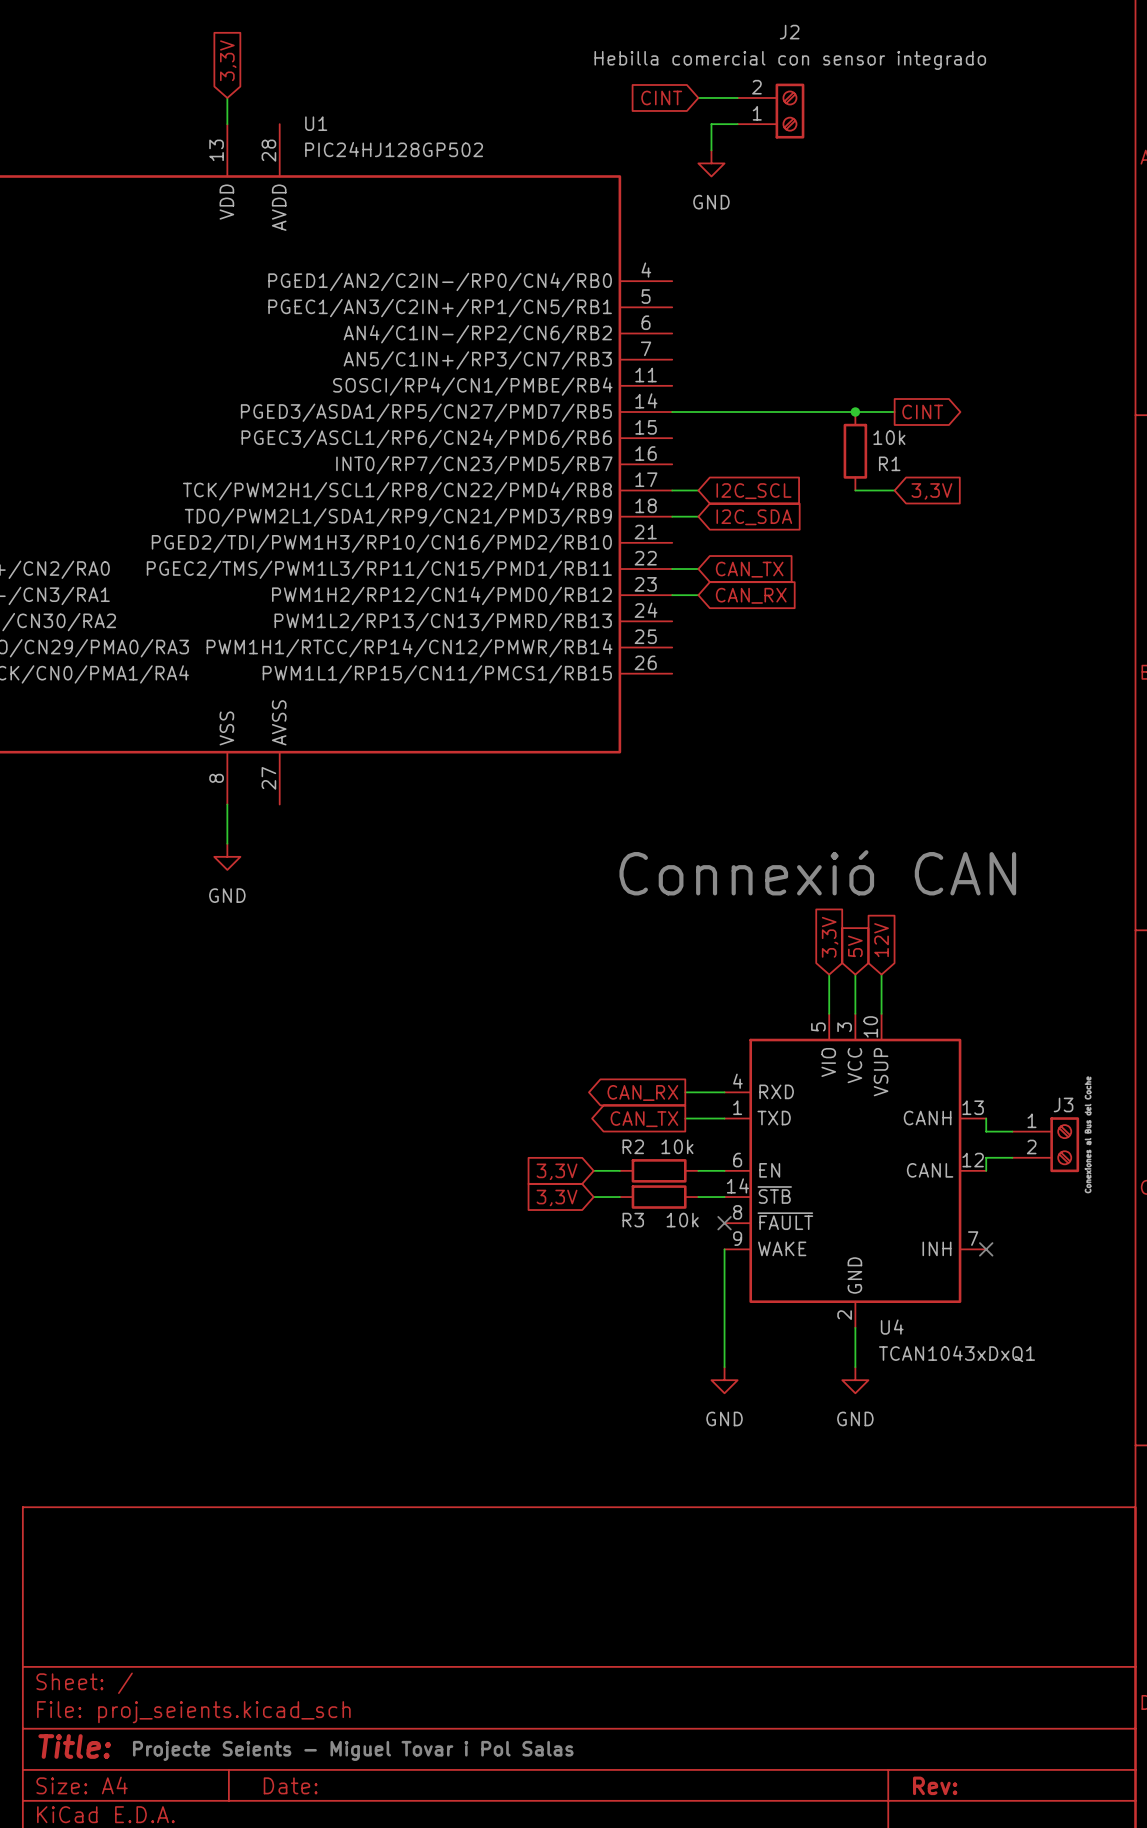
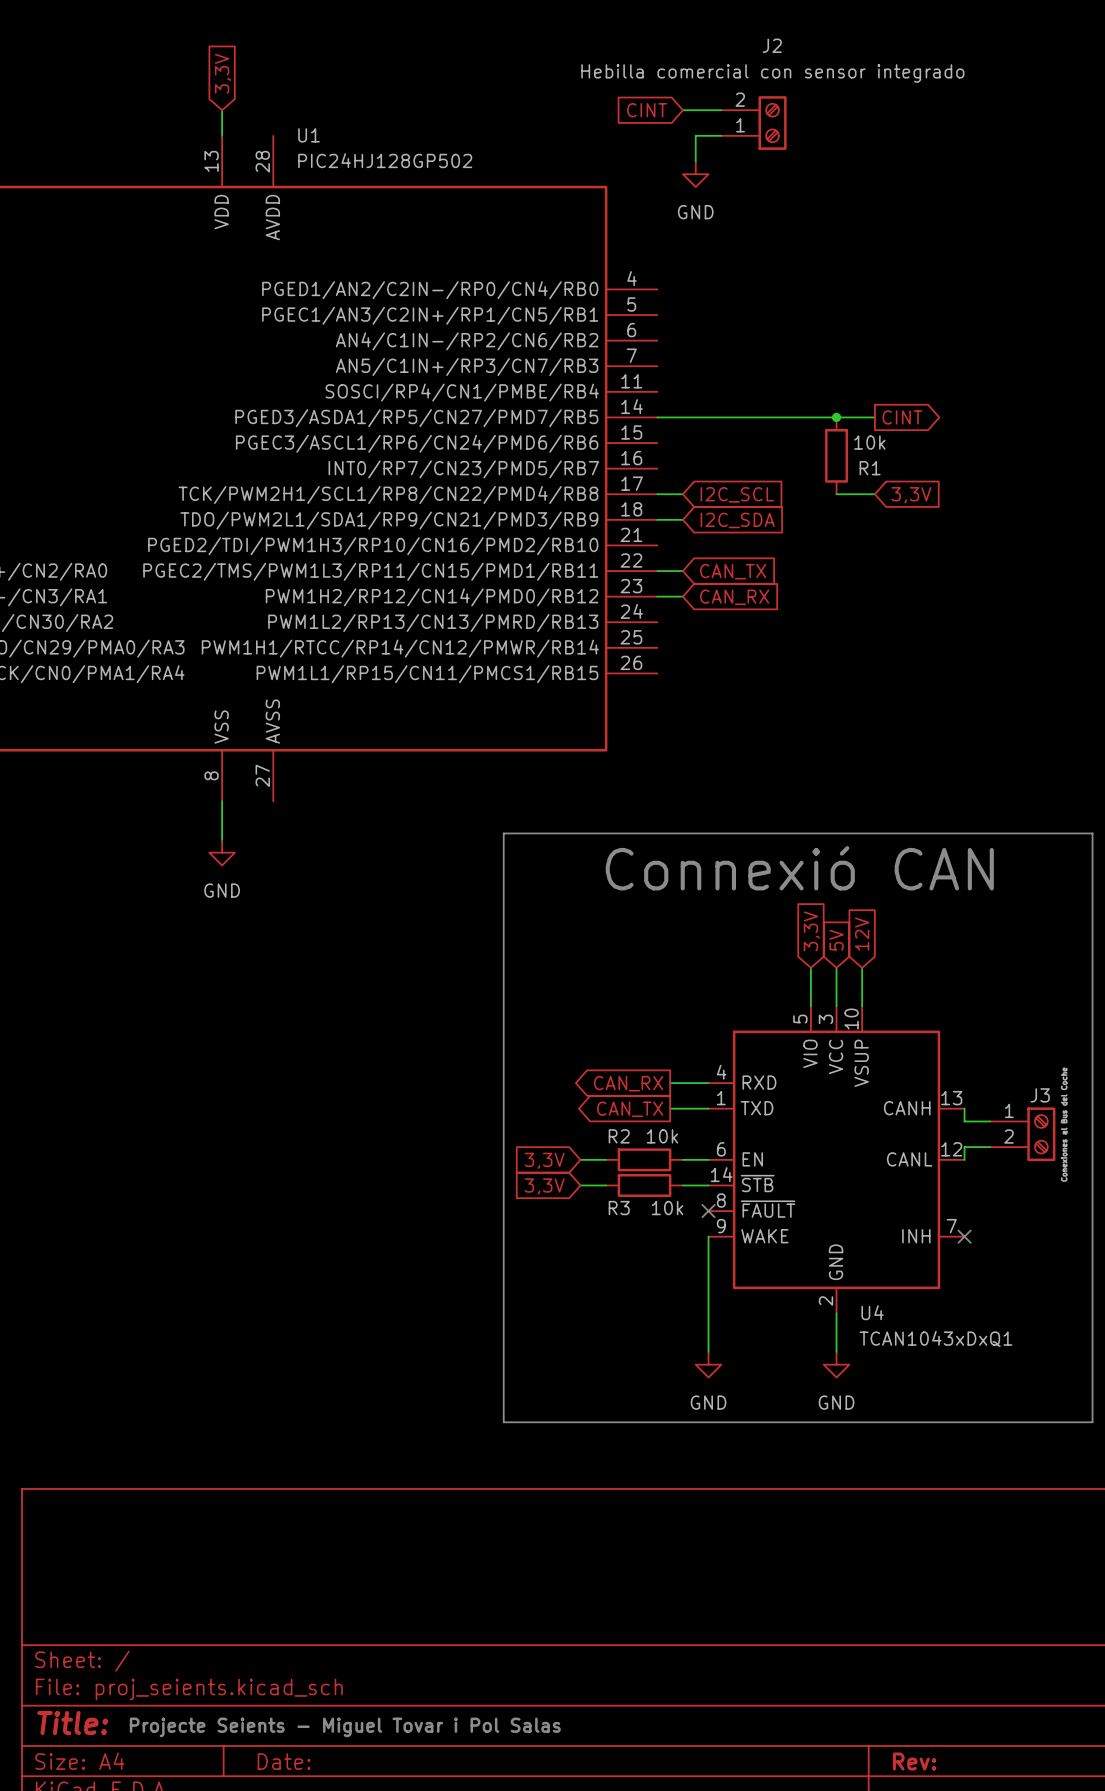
line: none -> (503, 833) (503, 1422) (1092, 1422) (1092, 833) (503, 833)

